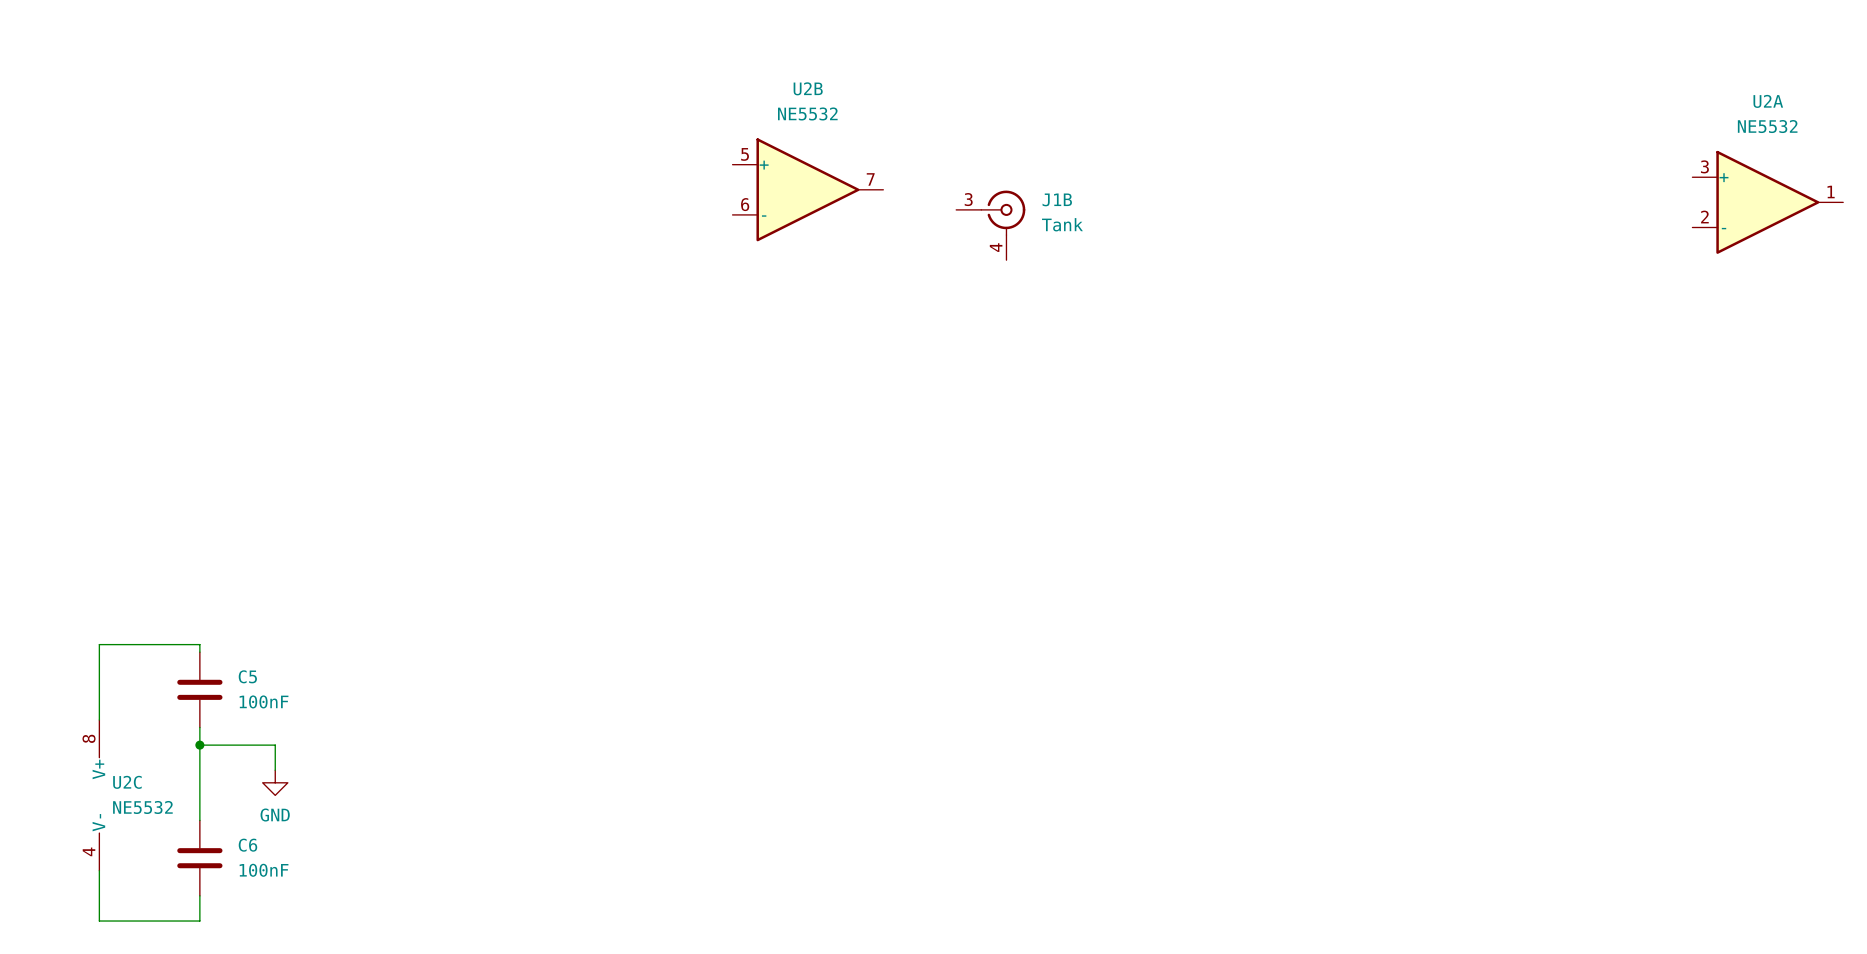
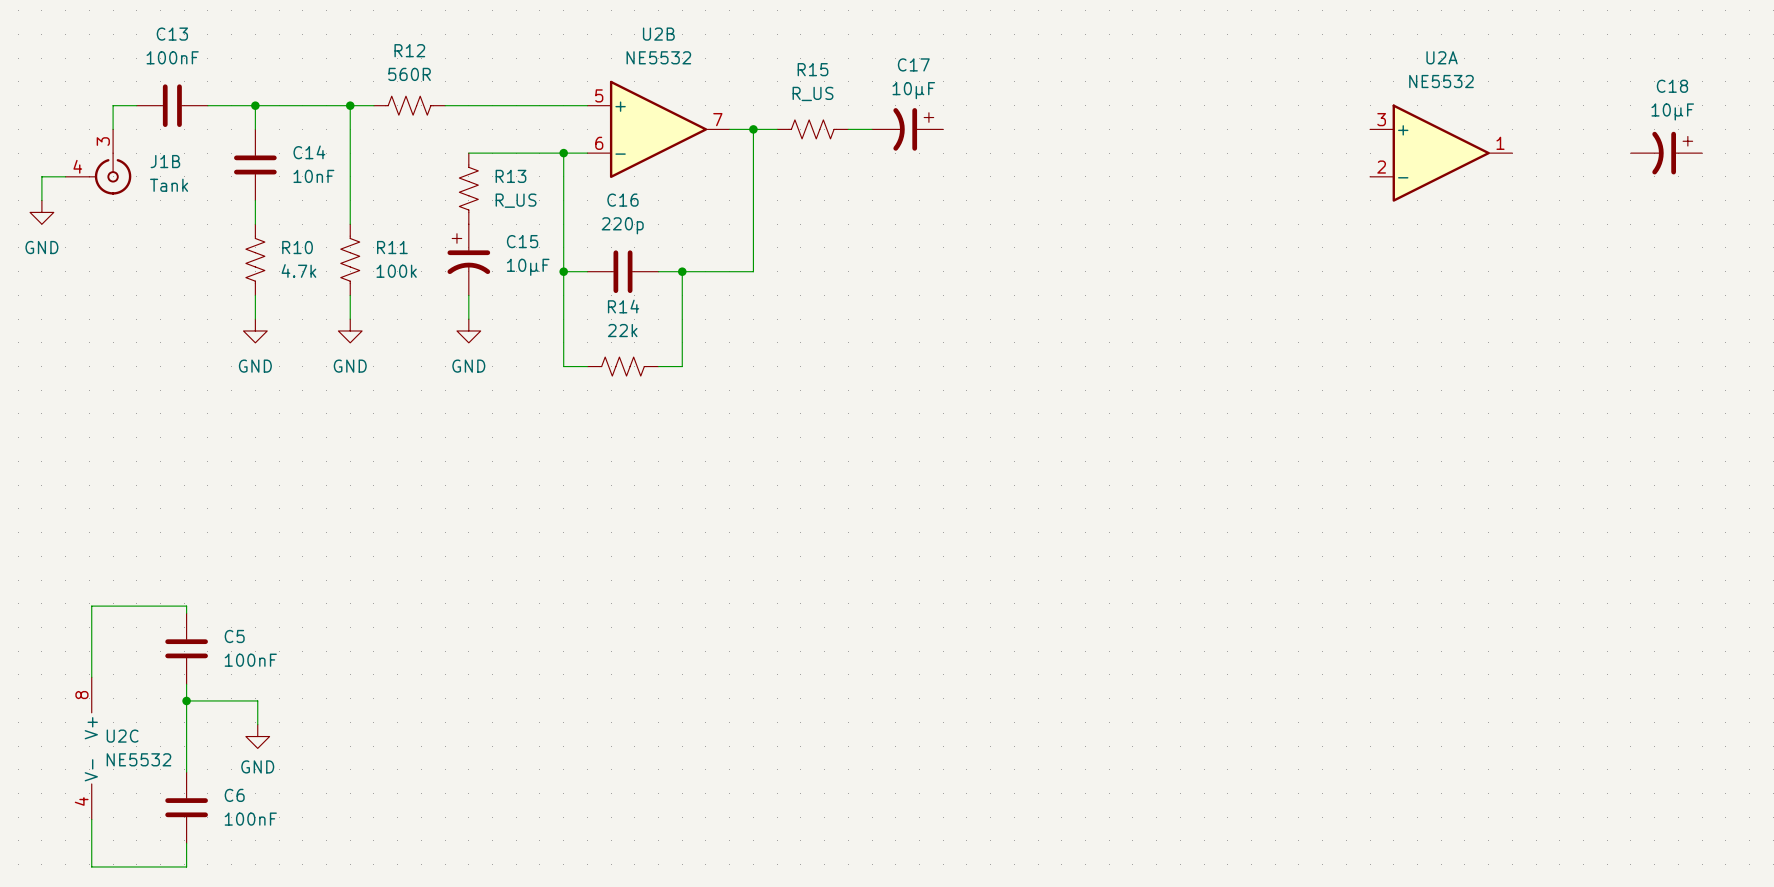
wire: none -> (136, 105) (113, 105) (113, 129)
C13: none -> 100nF (172, 105)
wire: none -> (207, 105) (373, 105)
wire: none -> (255, 105) (255, 129)
junction: none -> (255, 105)
wire: none -> (350, 105) (350, 224)
junction: none -> (350, 105)
R12: none -> 560R (409, 105)
wire: none -> (445, 105) (587, 105)
wire: none -> (729, 129) (777, 129)
wire: none -> (753, 129) (753, 271) (658, 271)
junction: none -> (753, 129)
R15: none -> R_US (812, 129)
wire: none -> (848, 129) (872, 129)
C17: none -> 10µF (907, 129)
wire: none -> (468, 153) (587, 153)
wire: none -> (563, 153) (563, 366) (587, 366)
junction: none -> (563, 153)
C18: none -> 10µF (1666, 153)
C14: none -> 10nF (255, 164)
wire: none -> (65, 176) (41, 176) (41, 200)
U2B position: (807, 189) -> (658, 129)
J1B name position: J1B (1057, 199) -> J1B (165, 161)
R13: none -> R_US (468, 188)
U2A position: (1767, 202) -> (1441, 153)
J1B rotation: 0° (1003, 212) -> 90° clockwise (110, 173)
wire: none -> (255, 200) (255, 224)
J1B value position: Tank (1062, 224) -> Tank (169, 185)
J1B position: (990, 225) -> (98, 162)
power symbol: none -> GND (41, 212)
R10: none -> 4.7k (255, 259)
R11: none -> 100k (350, 259)
C15: none -> 10µF (468, 259)
wire: none -> (563, 271) (587, 271)
junction: none -> (563, 271)
C16: none -> 220p (622, 271)
wire: none -> (682, 271) (682, 366) (658, 366)
junction: none -> (682, 271)
wire: none -> (255, 295) (255, 319)
wire: none -> (350, 295) (350, 319)
wire: none -> (468, 295) (468, 319)
power symbol: none -> GND (255, 330)
power symbol: none -> GND (350, 330)
power symbol: none -> GND (468, 330)
R14: none -> 22k (622, 366)

